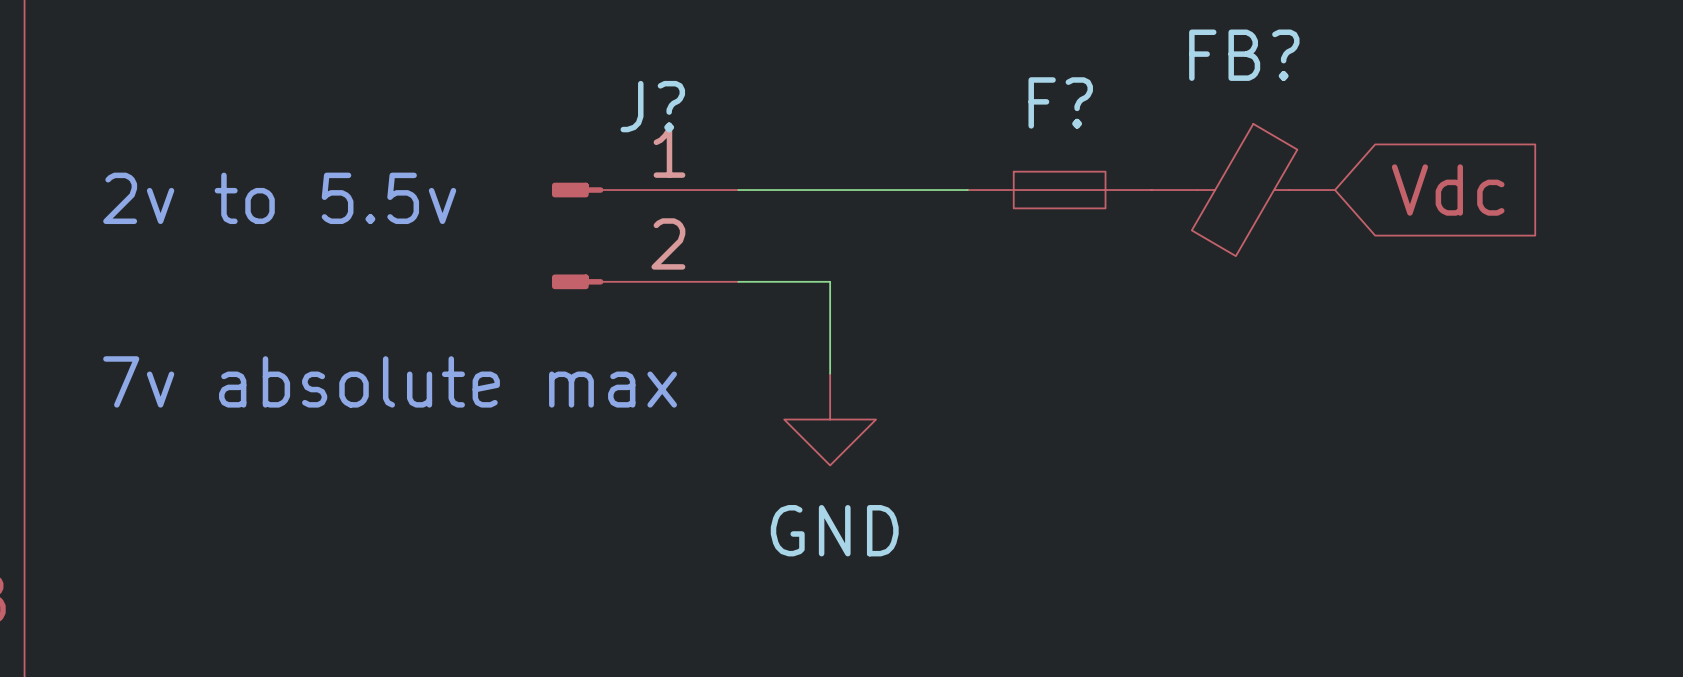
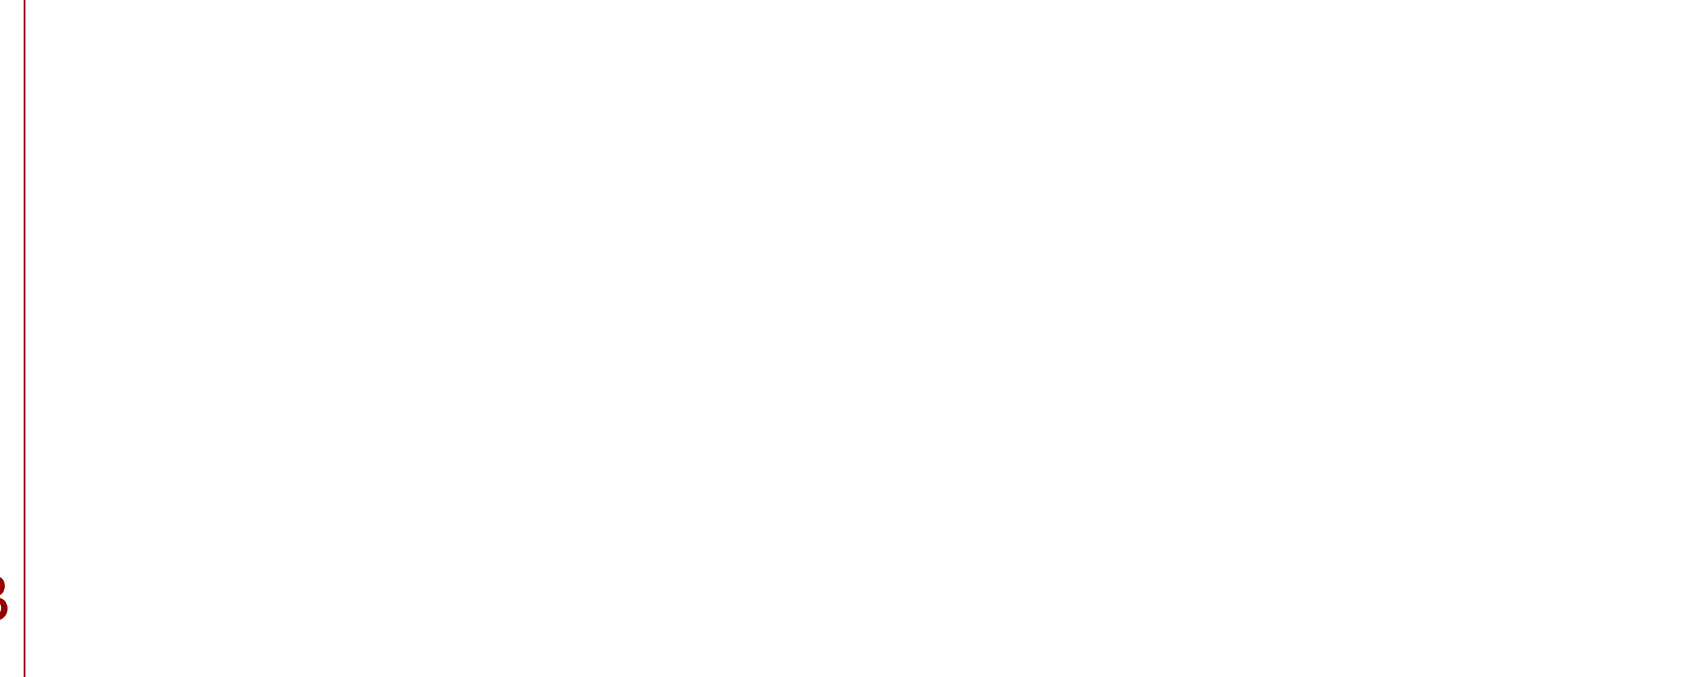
wire: (738, 190) (967, 190) -> none
F?: (1059, 190) -> none
FB?: (1243, 190) -> none
global label: Vdc (1448, 190) -> none
text: 2v to 5.5v (279, 198) -> none
J?: (645, 235) -> none
wire: (738, 281) (830, 281) (830, 373) -> none
text: 7v absolute max (390, 381) -> none
power symbol: GND (830, 419) -> none

